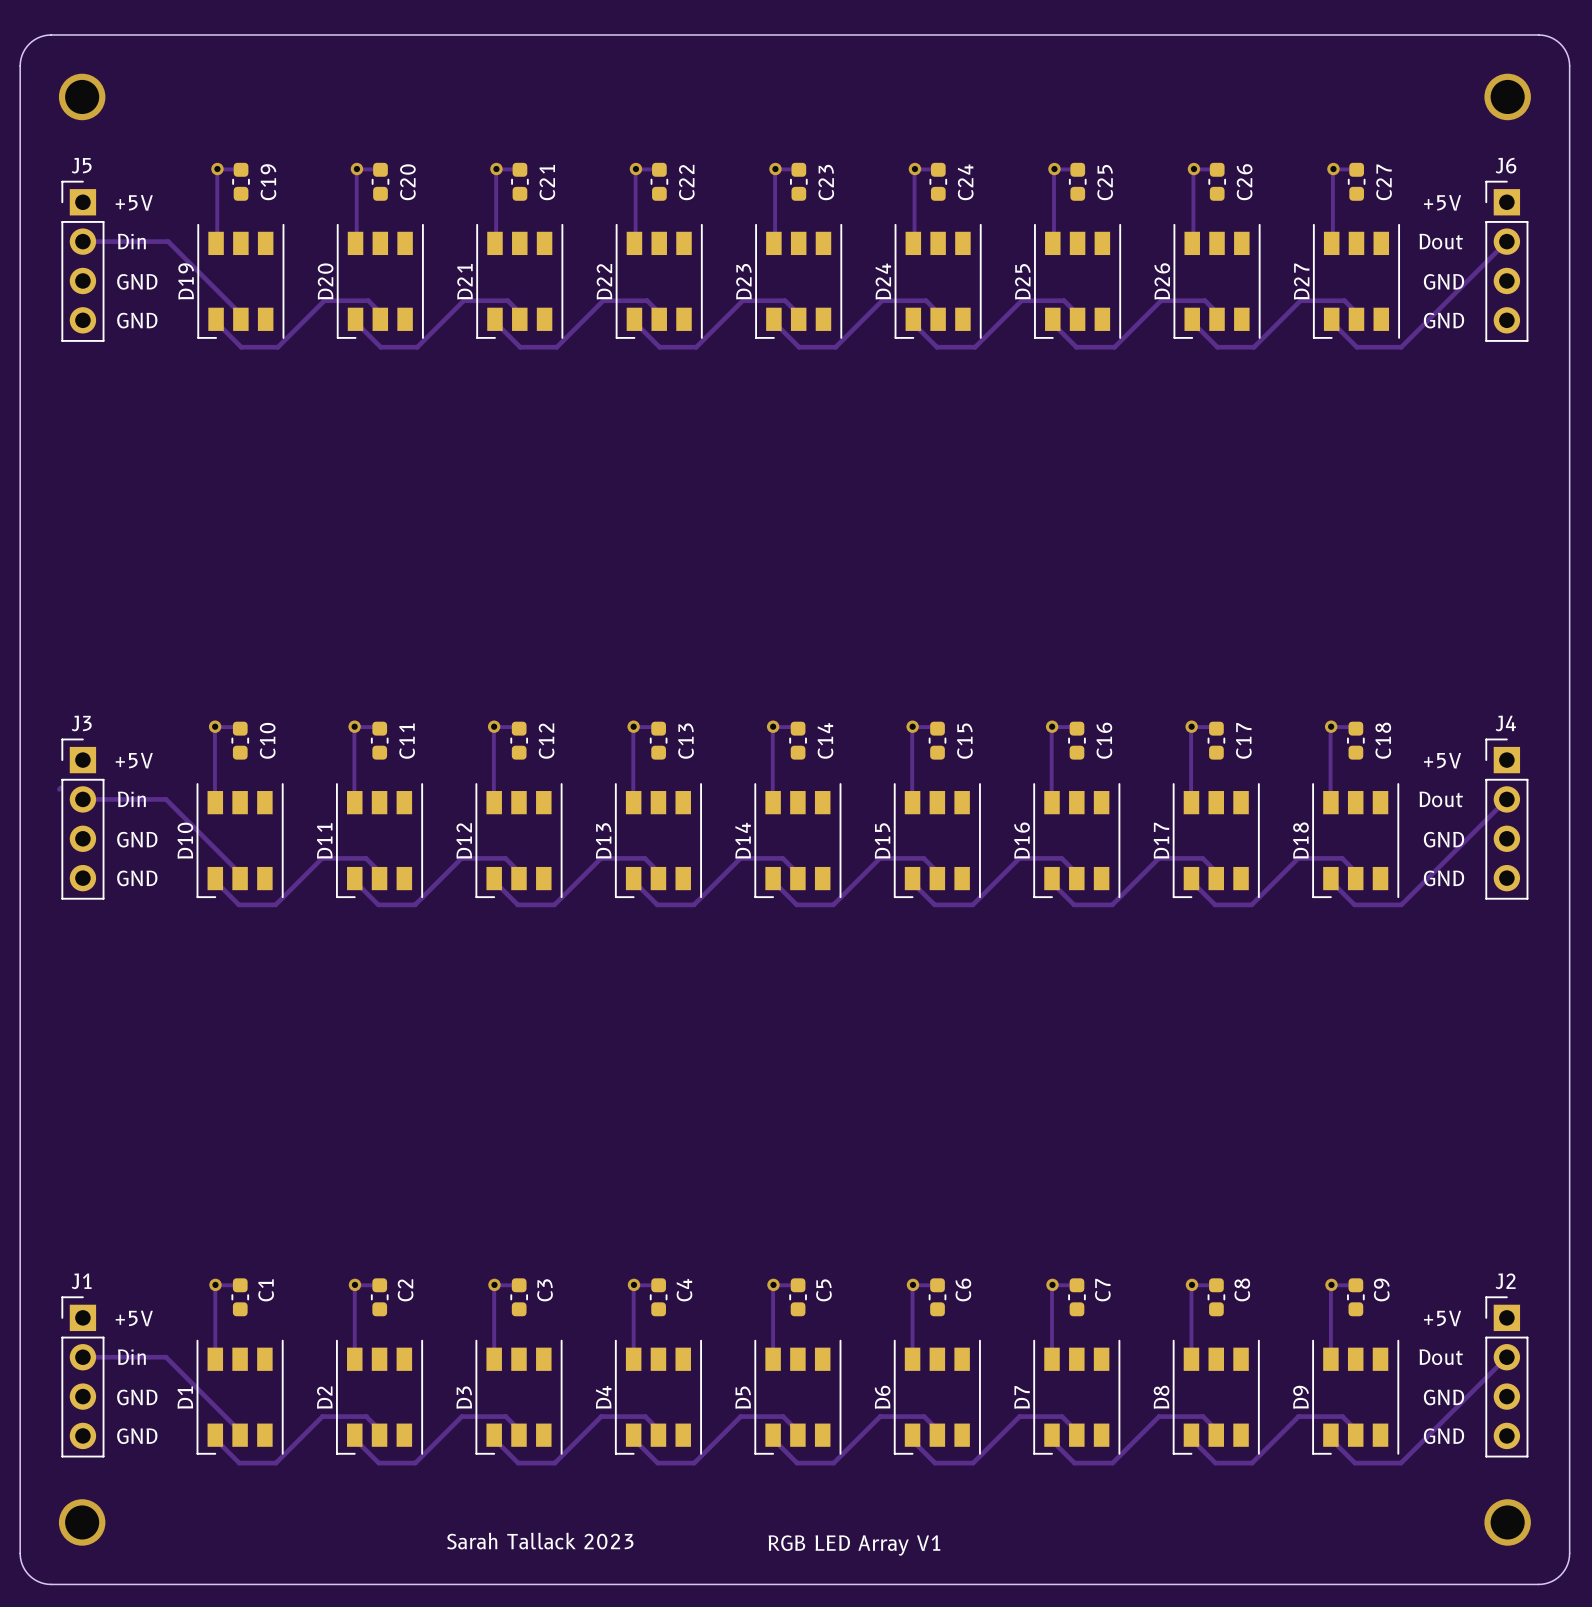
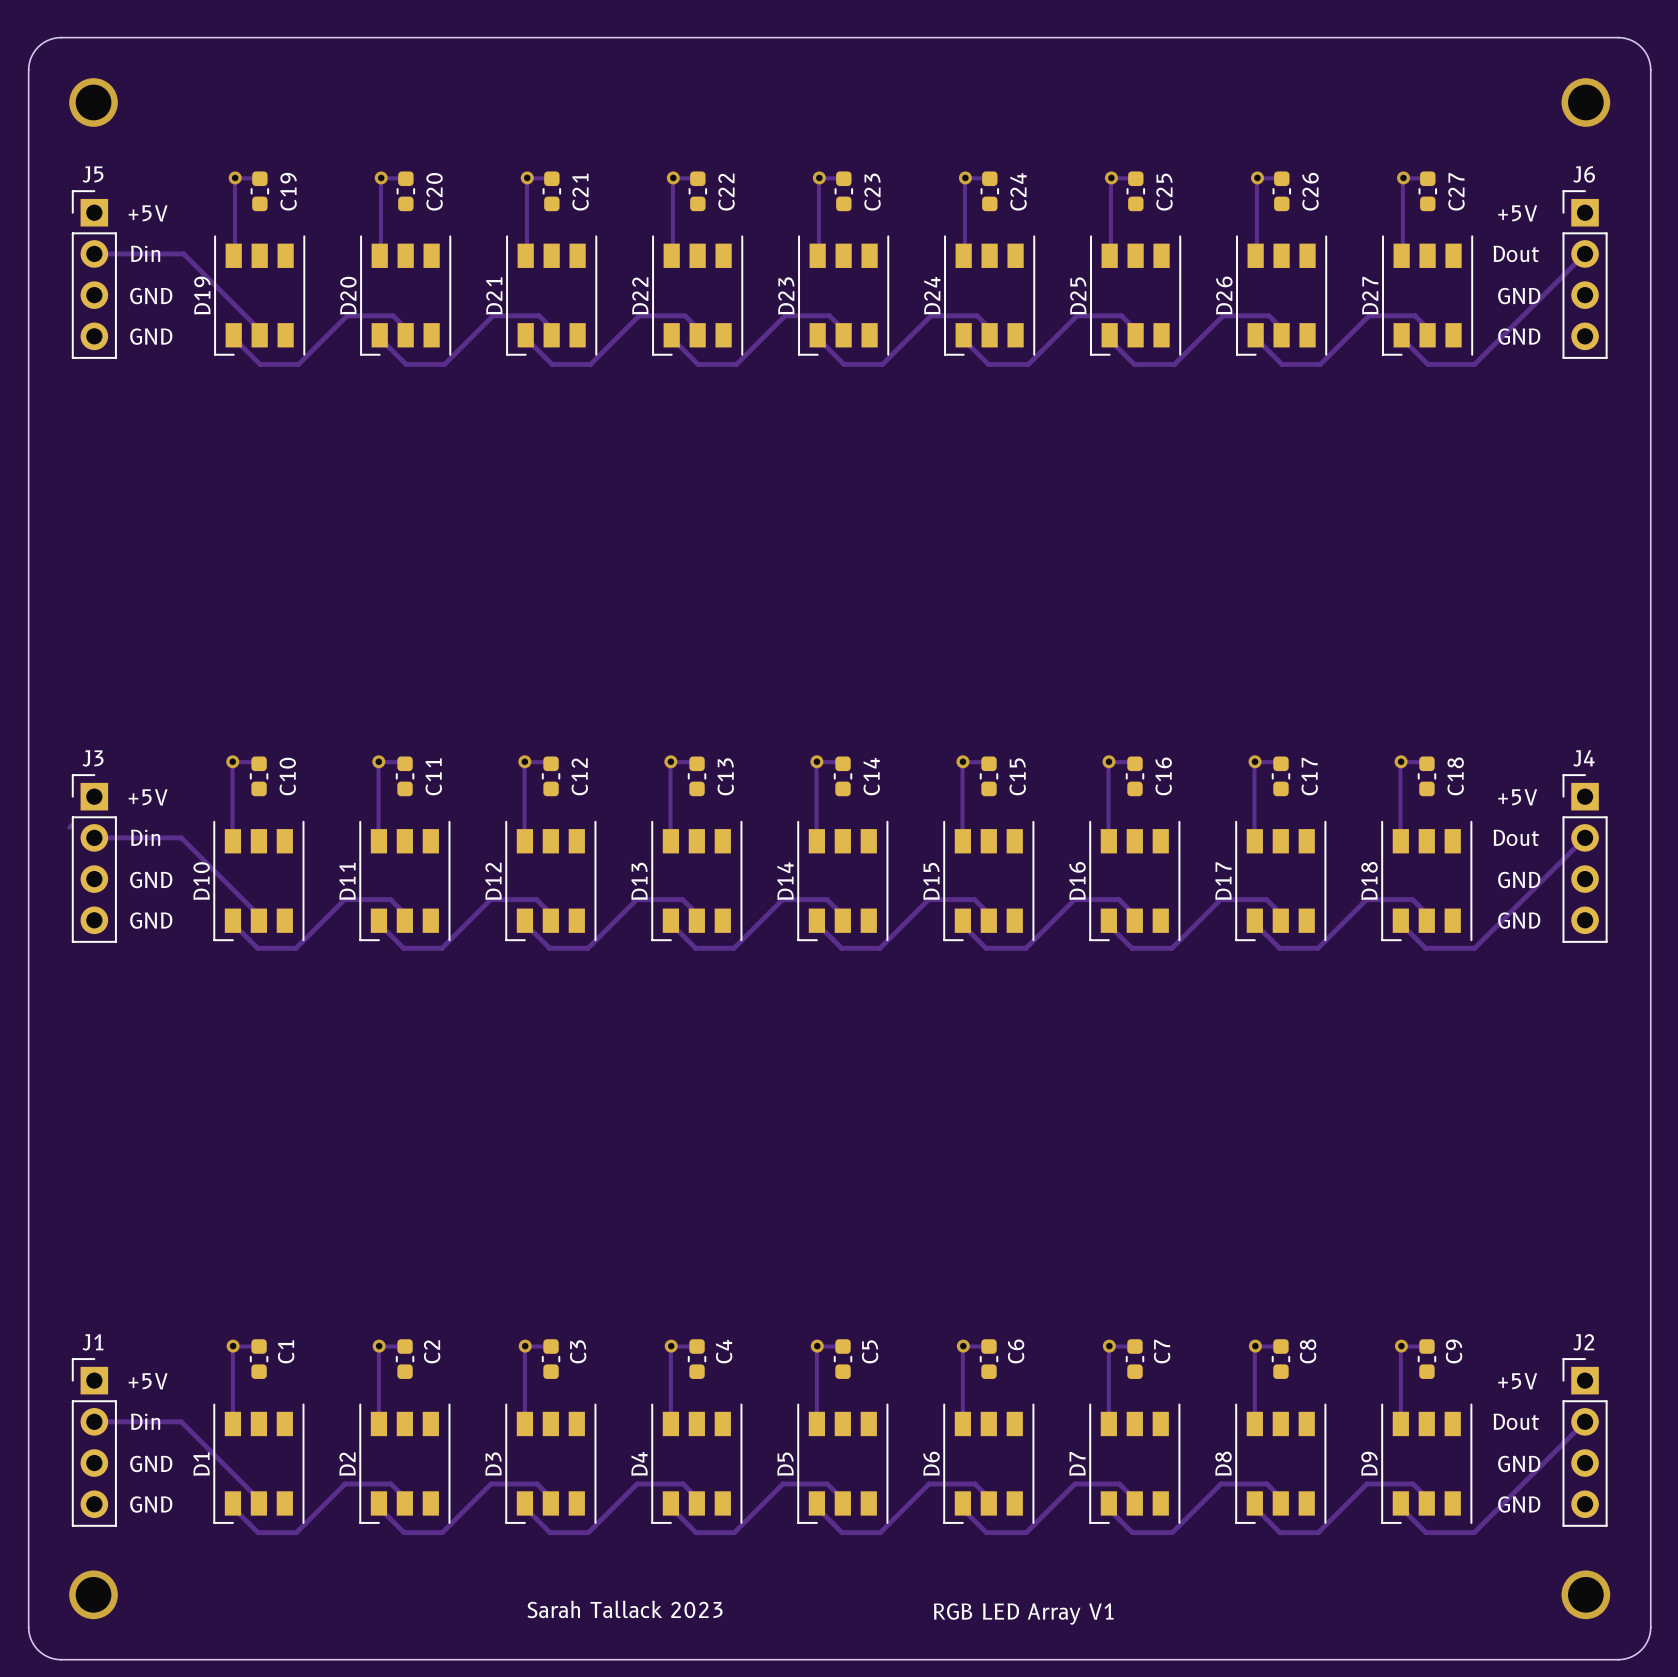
text position: Sarah Tallack 2023 (540, 1541) -> Sarah Tallack 2023 (625, 1609)
text position: RGB LED Array V1 (854, 1545) -> RGB LED Array V1 (1023, 1614)

